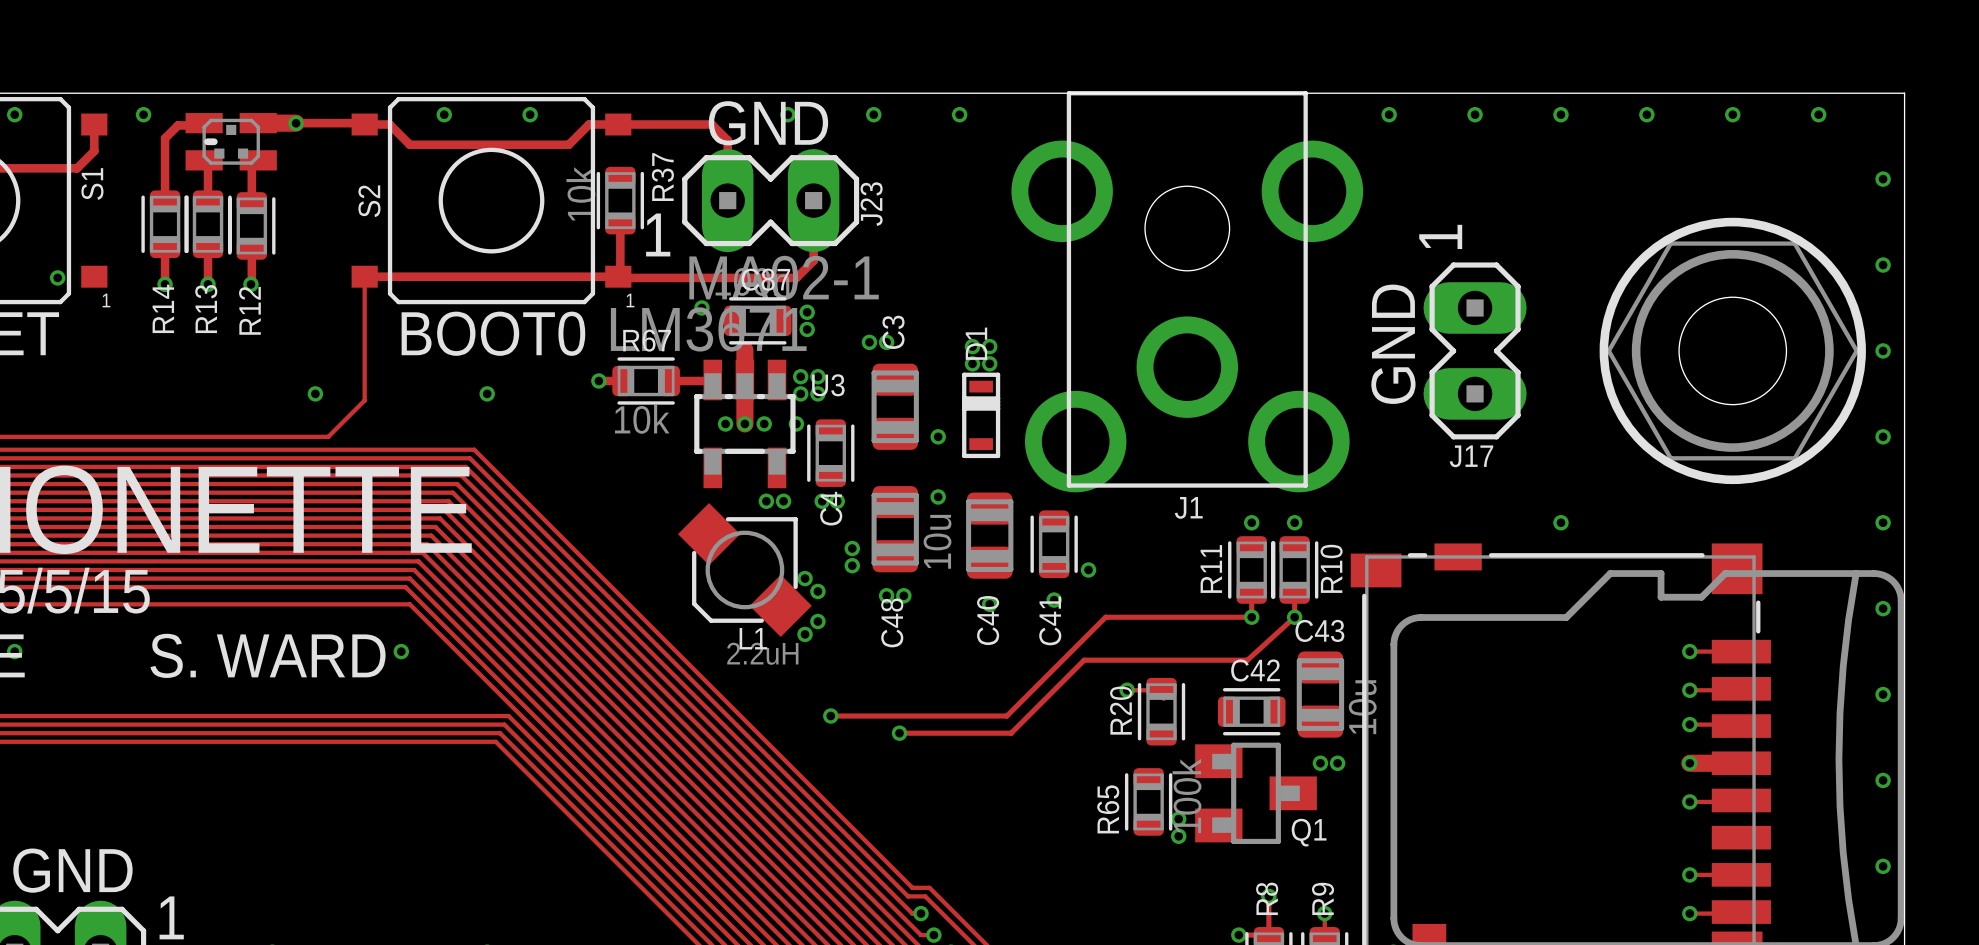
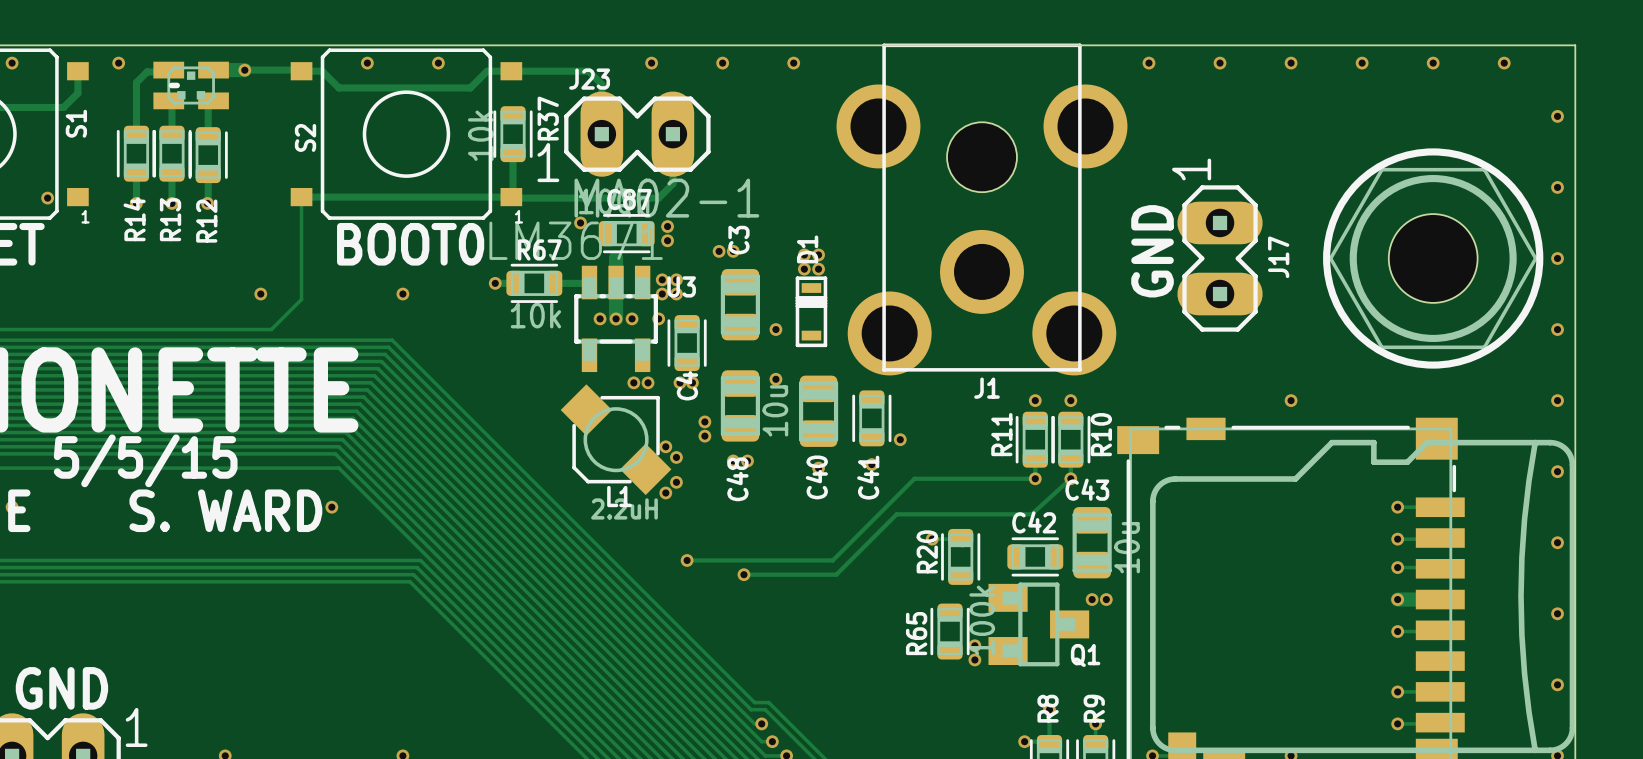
text: GND (768, 123) -> none
J23 name rotation: 0° (871, 204) -> 90° clockwise (589, 79)
J23 name position: J23 (871, 204) -> J23 (589, 79)
J17 name rotation: 0° (1471, 456) -> 90° counterclockwise (1278, 257)
J17 name position: J17 (1471, 456) -> J17 (1278, 257)

